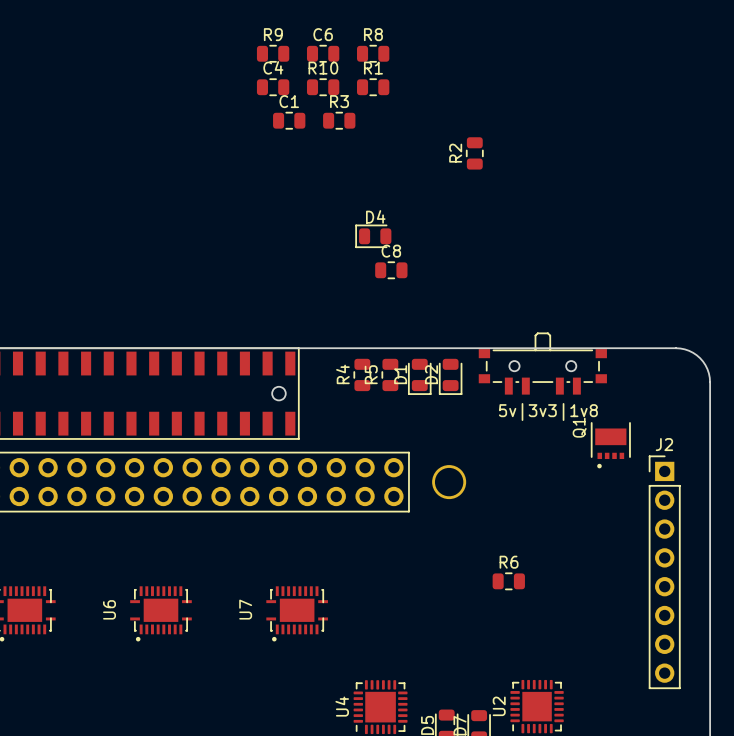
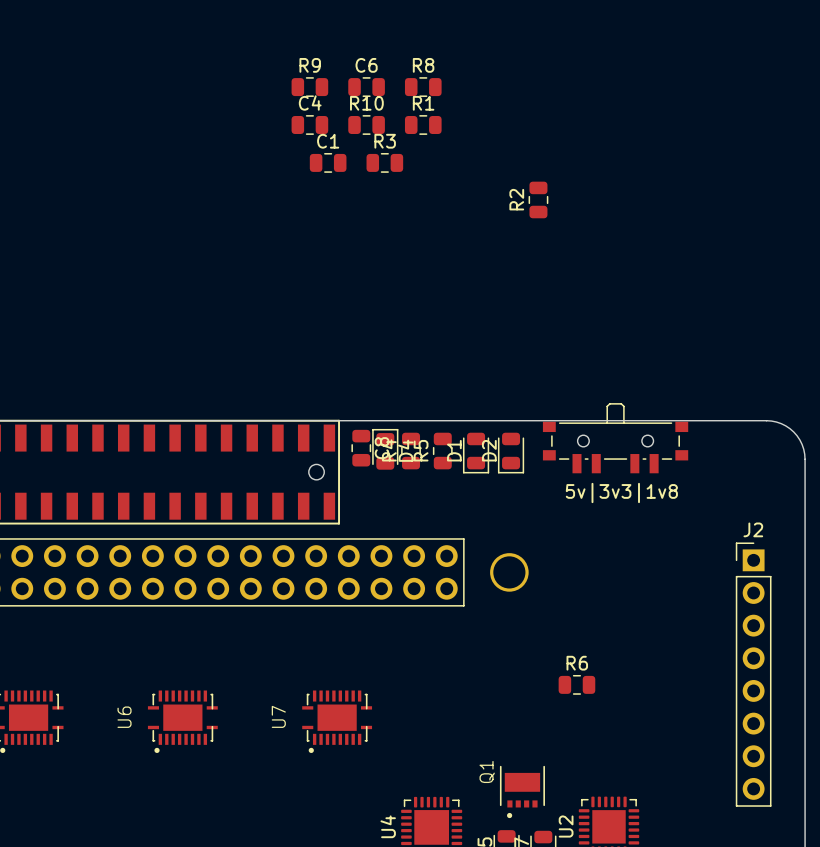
D4 rotation: 0° (373, 236) -> 90° clockwise (385, 449)
D4 position: (373, 236) -> (385, 449)
C8 rotation: 0° (391, 270) -> 90° clockwise (361, 448)
C8 position: (391, 270) -> (361, 448)
Q1 position: (610, 445) -> (522, 791)

